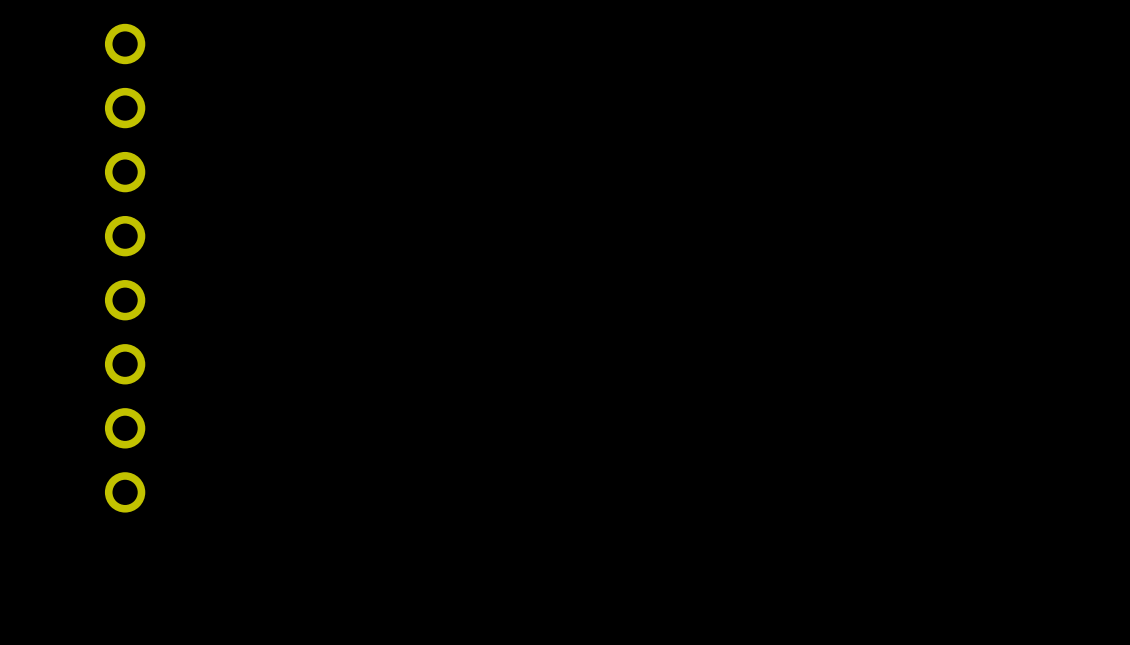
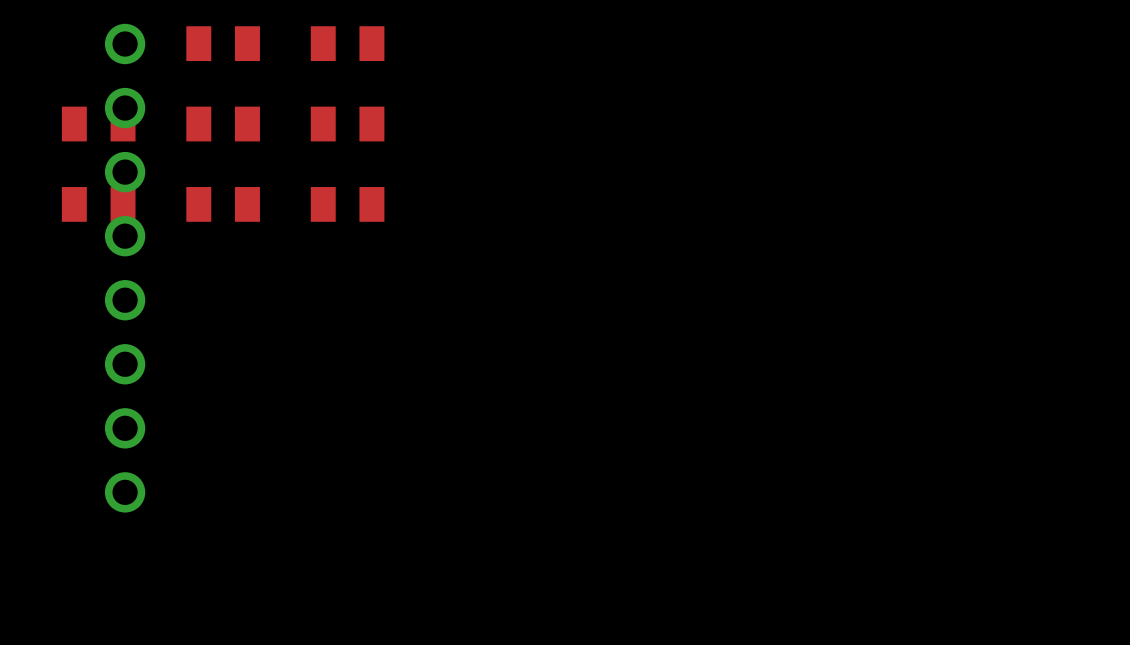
part: none -> (223, 43)
part: none -> (347, 43)
part: none -> (98, 124)
part: none -> (223, 124)
part: none -> (347, 124)
part: none -> (98, 204)
part: none -> (223, 204)
part: none -> (347, 204)

